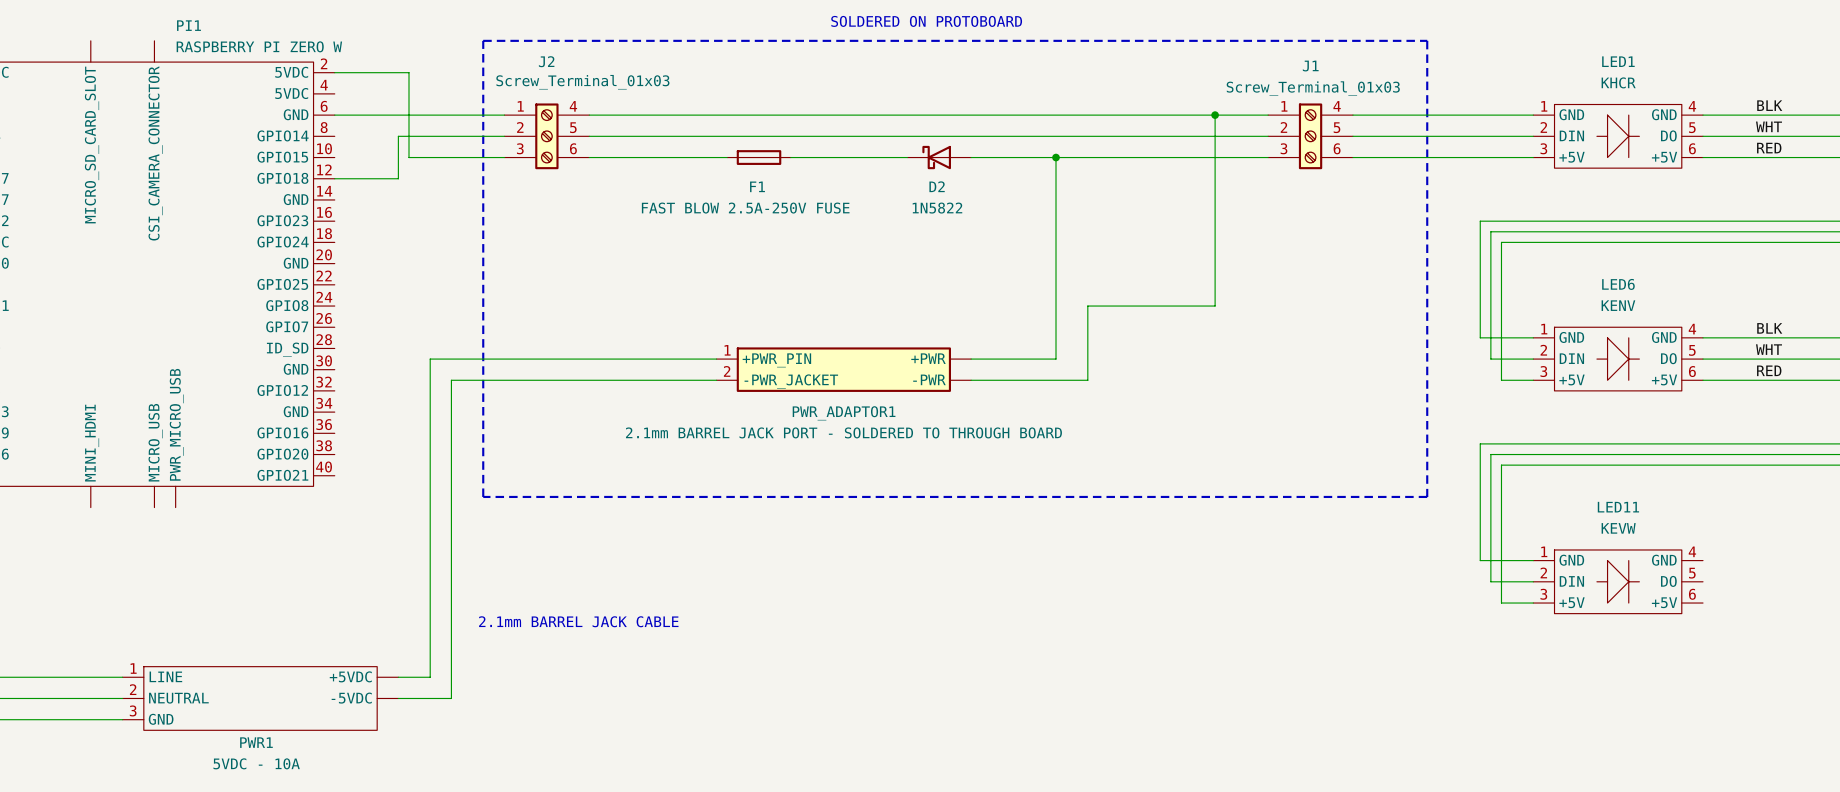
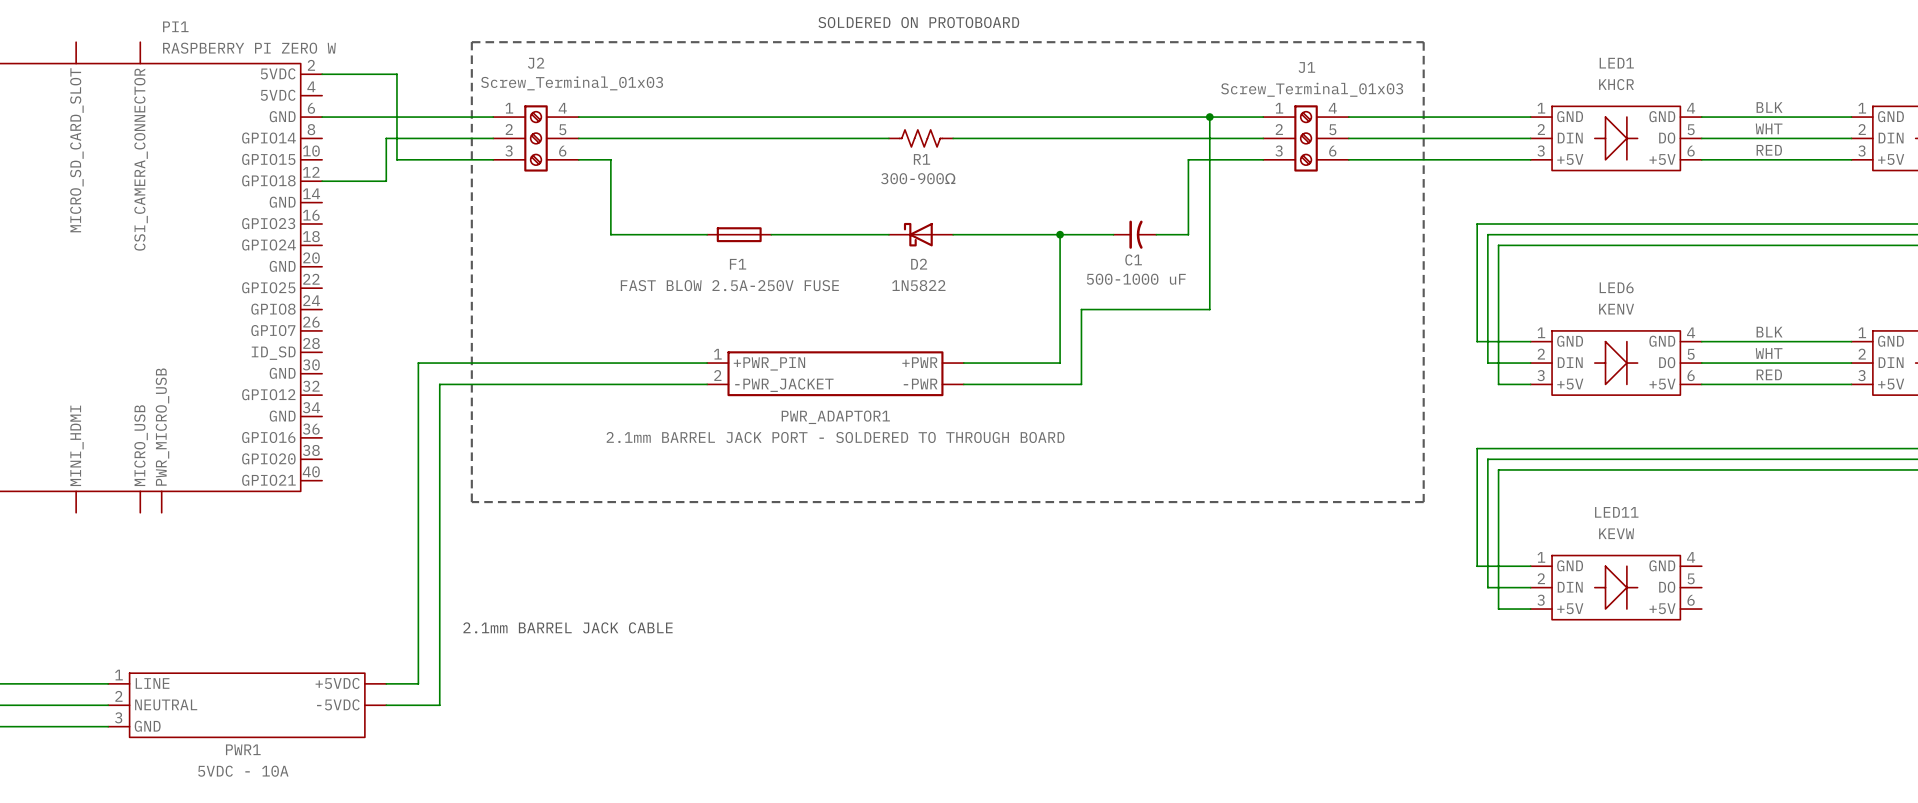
R1: none -> 300-900Ω (921, 138)
wire: (621, 157) (727, 157) -> (610, 159) (610, 234) (707, 234)
F1 position: (759, 157) -> (739, 234)
wire: (790, 157) (907, 157) -> (771, 234) (888, 234)
D2 position: (939, 157) -> (921, 234)
wire: (971, 157) (1193, 157) -> (1156, 234) (1188, 234) (1188, 159)
wire: (1056, 157) (1056, 359) -> (1060, 234) (1060, 363) (1049, 363)
junction: (1056, 157) -> none
wire: none -> (953, 234) (1113, 234)
junction: none -> (1060, 234)
C1: none -> 500-1000 uF (1134, 234)

